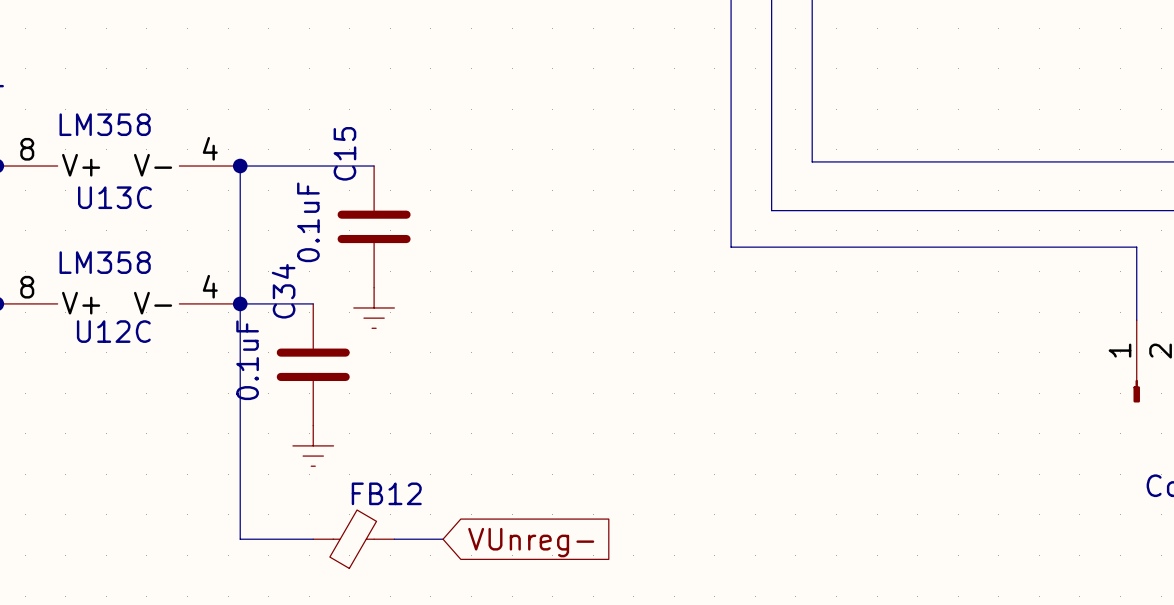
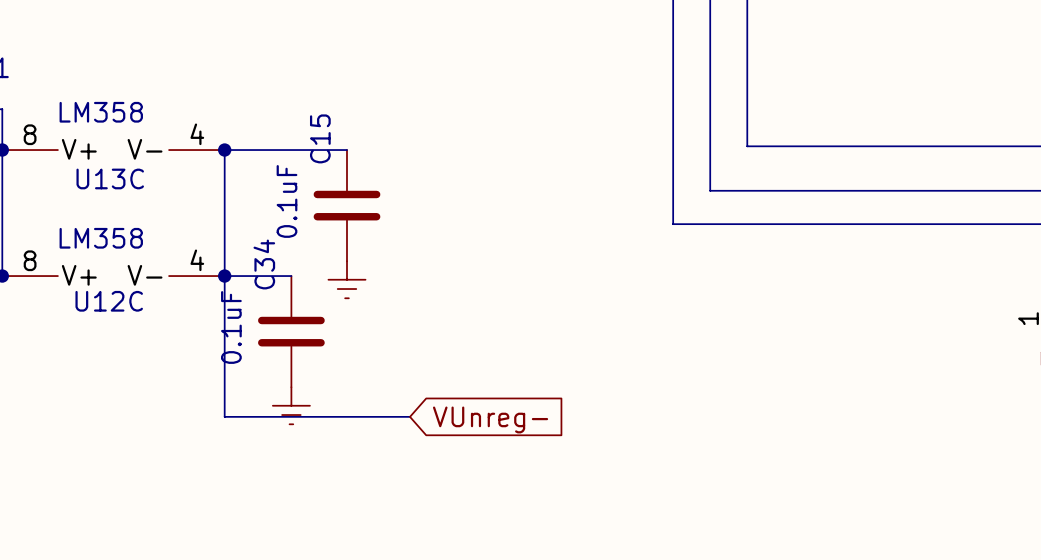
wire: (240, 458) (240, 539) (313, 539) -> (224, 416) (410, 416)
FB12: (353, 539) -> none
wire: (394, 539) (443, 539) -> none
global label position: VUnreg- (531, 542) -> VUnreg- (490, 419)

